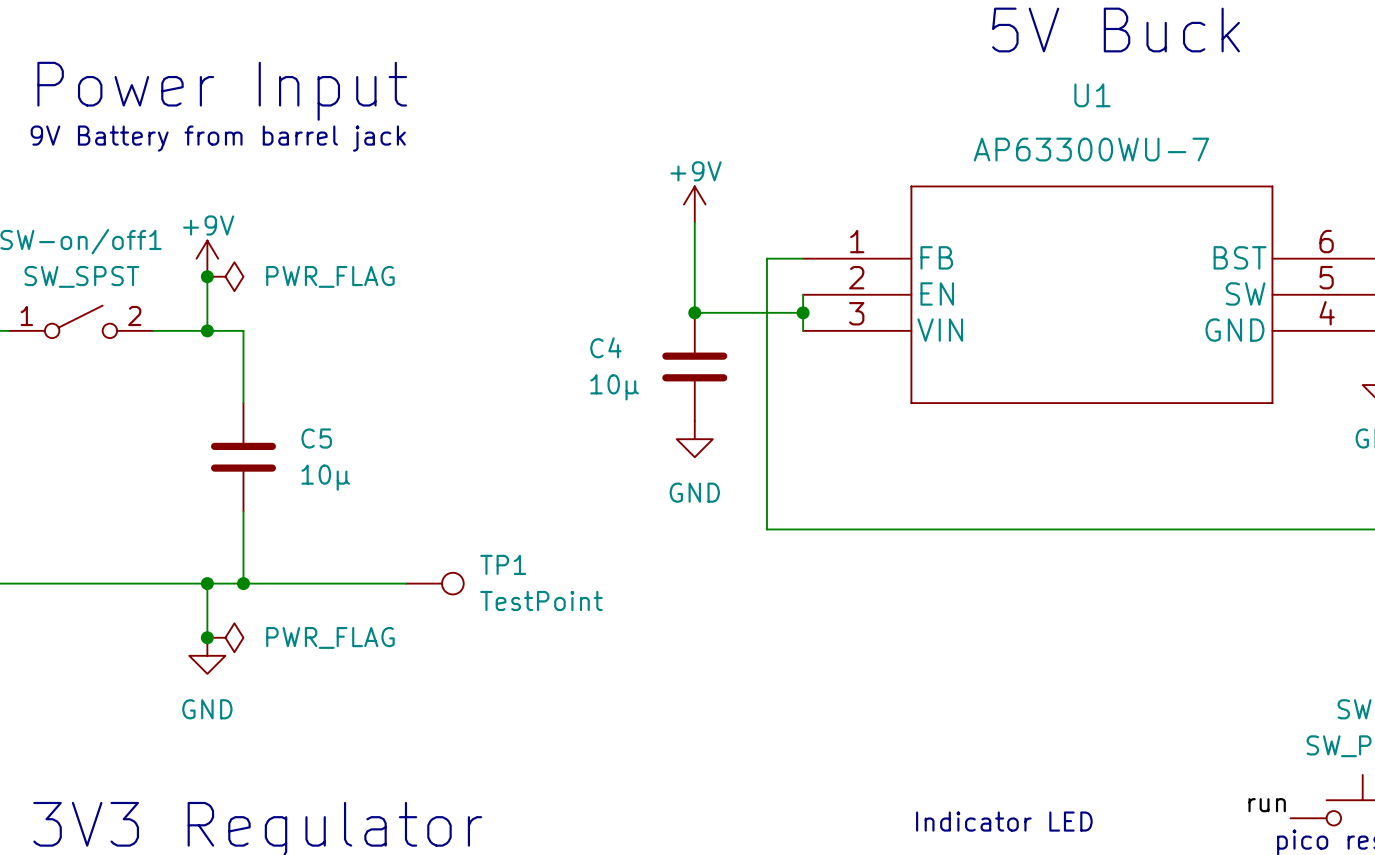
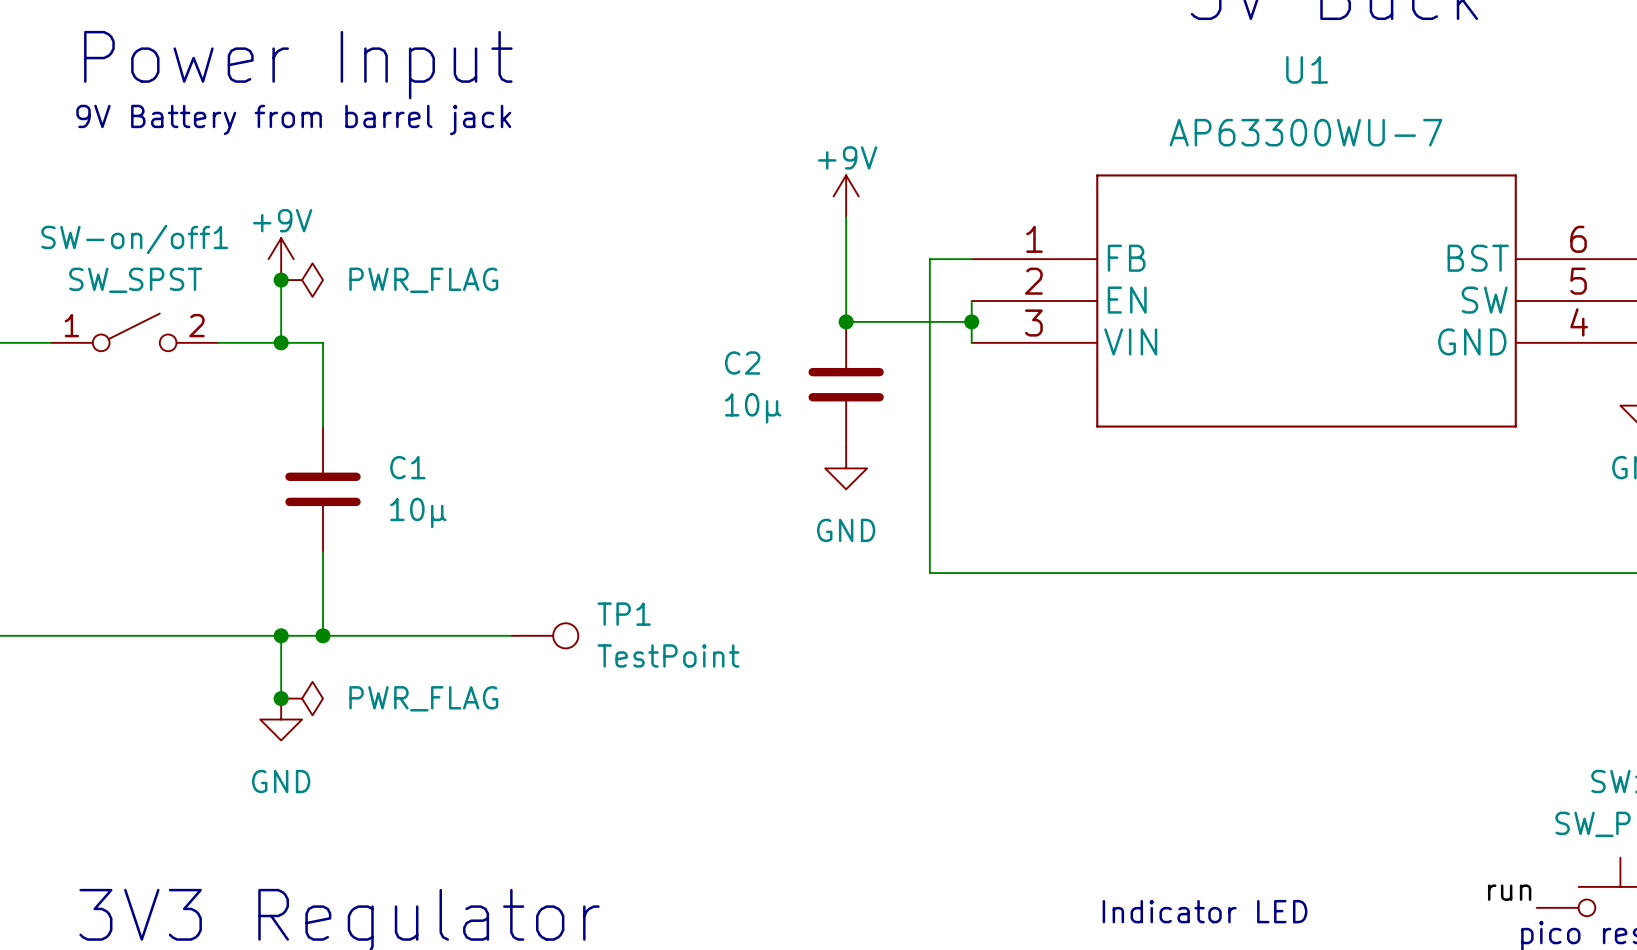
C4 name: C4 (605, 347) -> C2 (742, 363)
C5 name: C5 (316, 438) -> C1 (407, 467)

